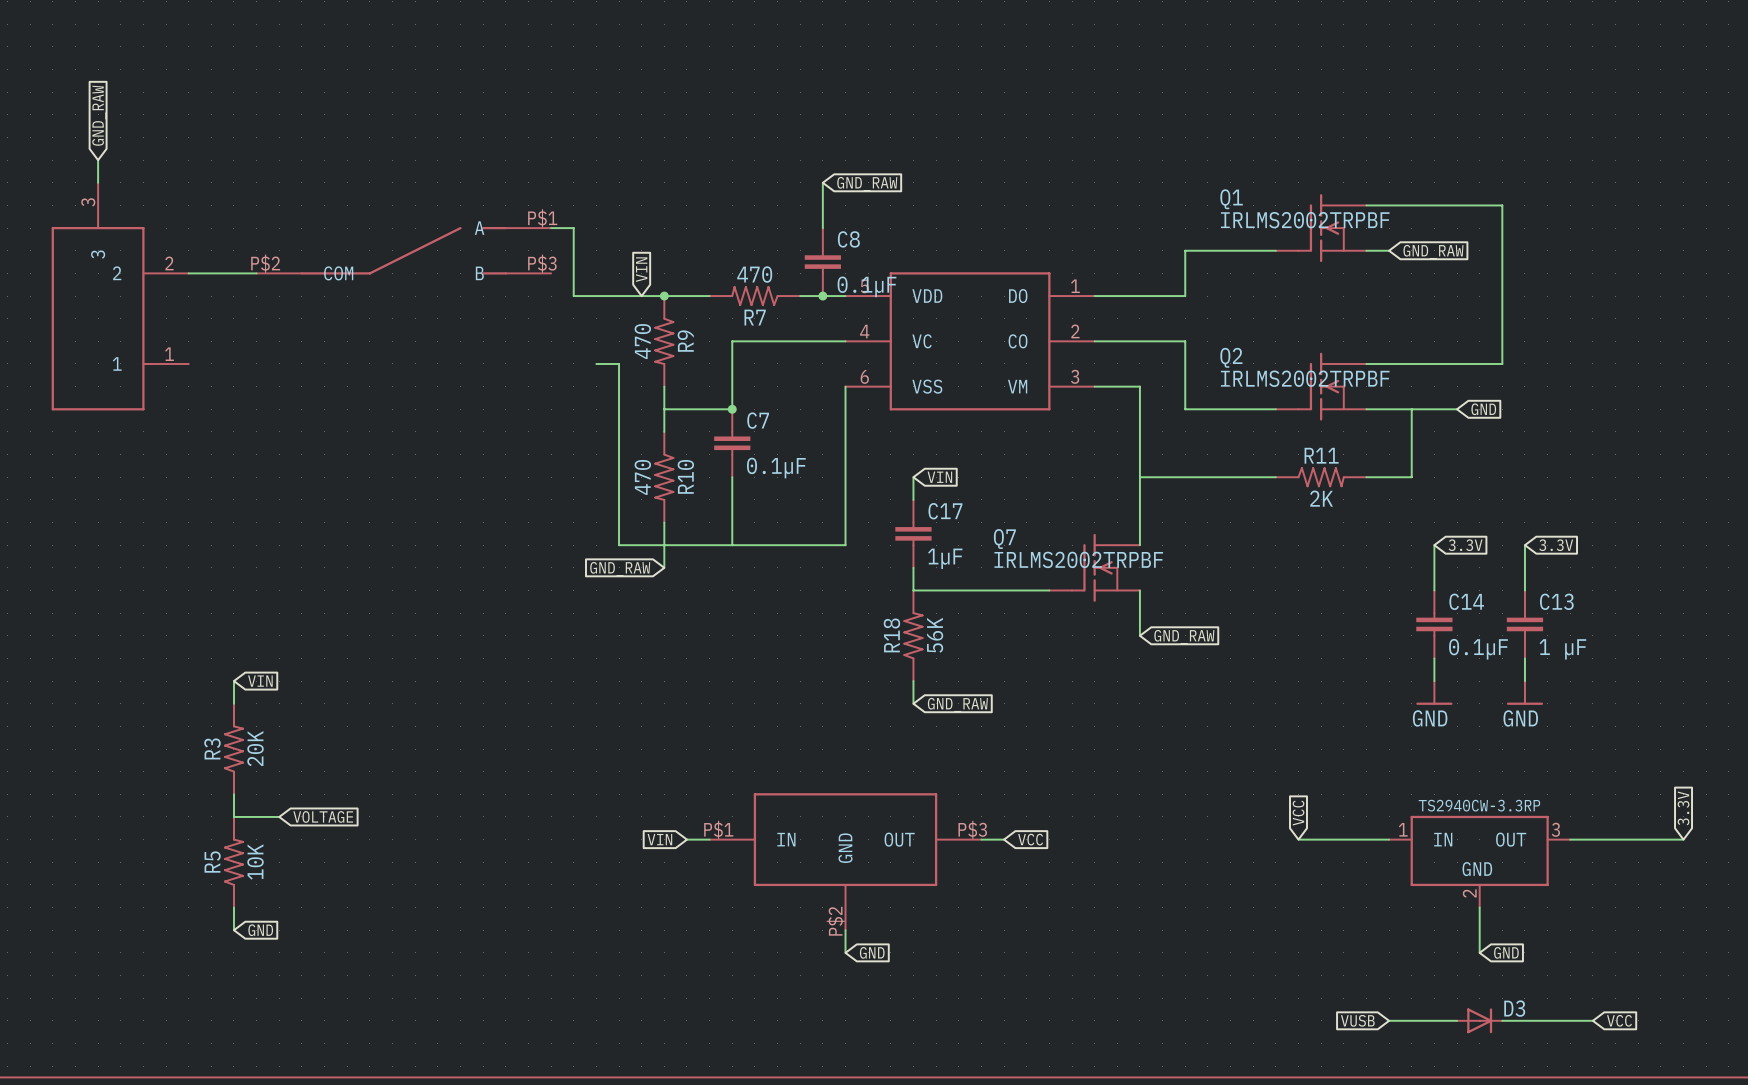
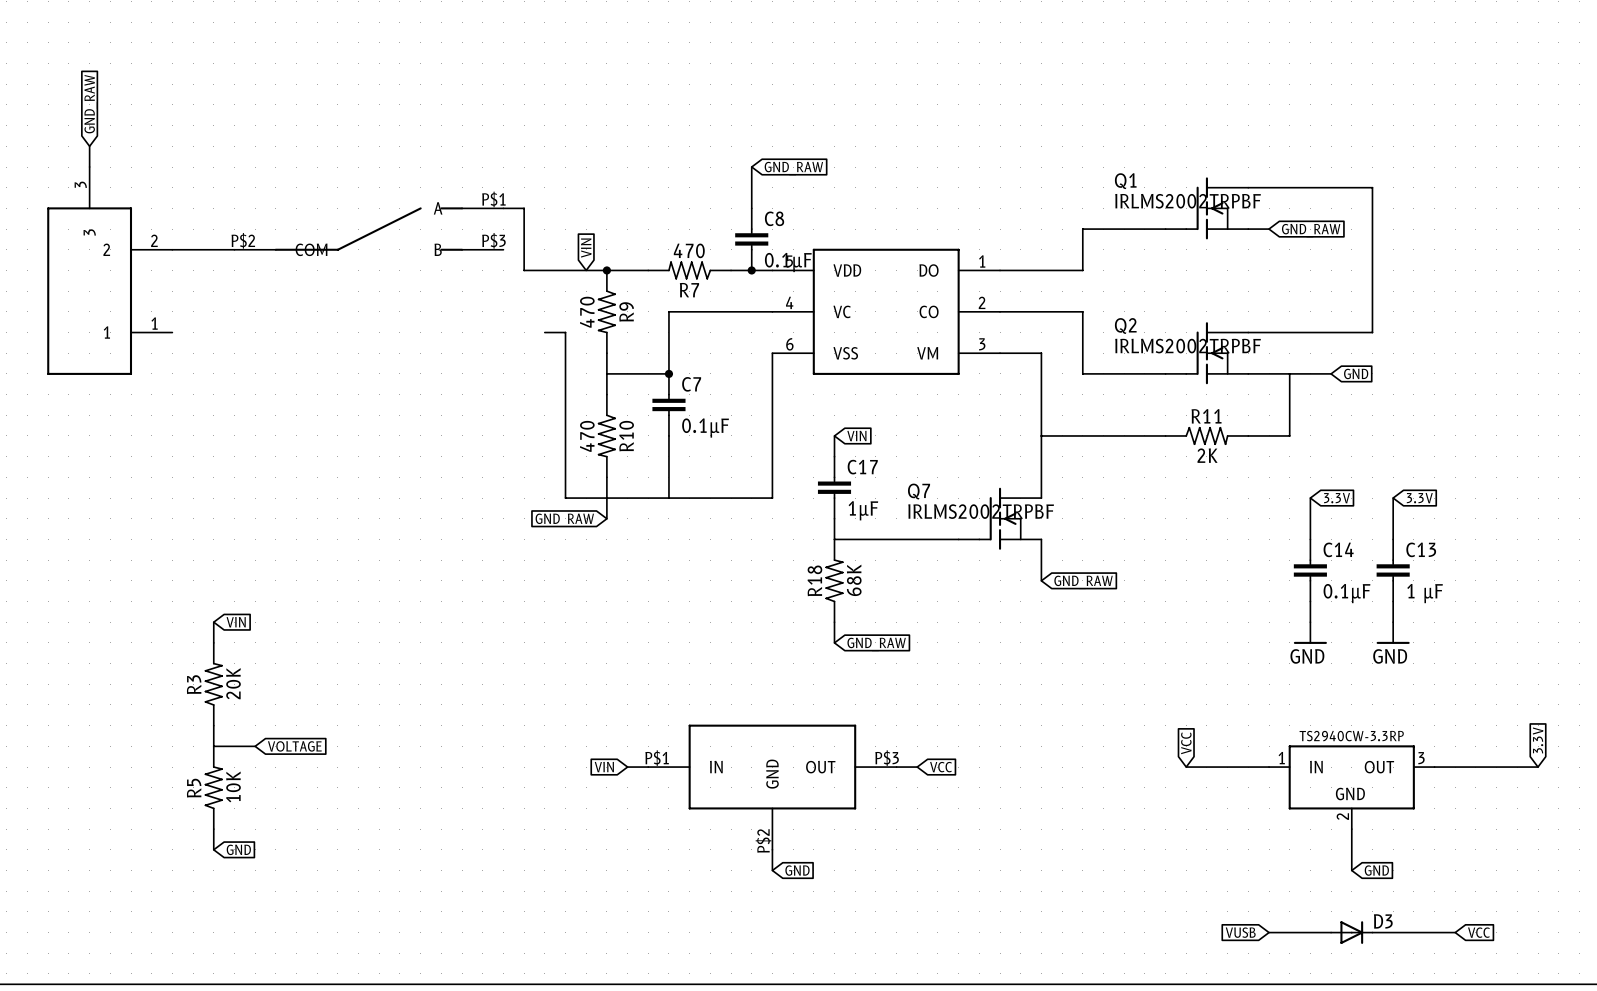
R18 value: 56K (935, 635) -> 68K (854, 580)

